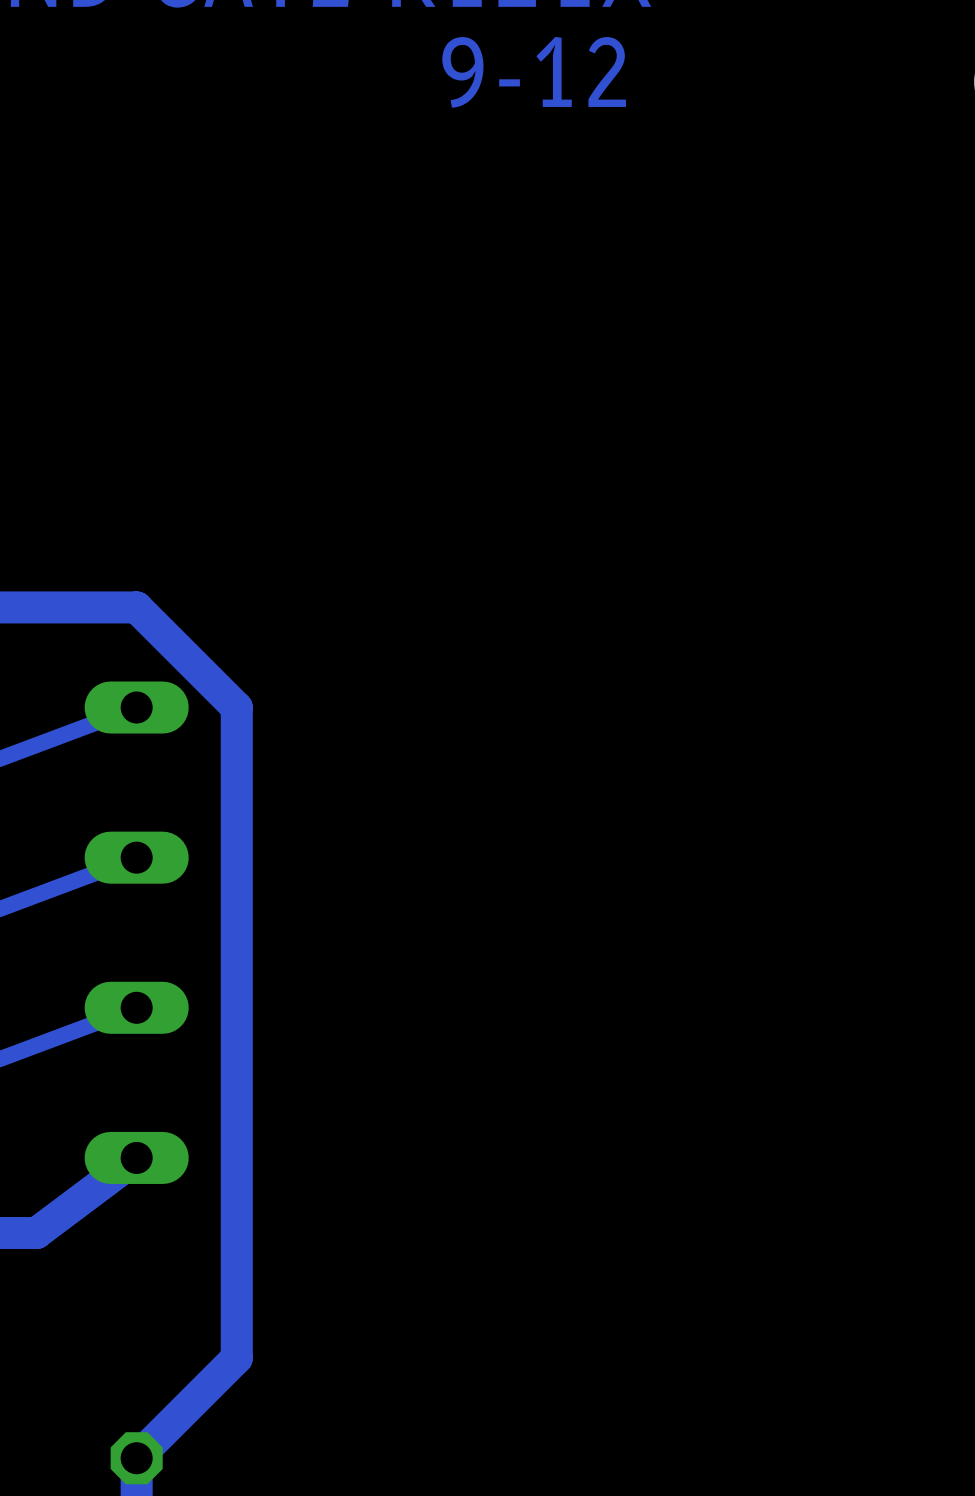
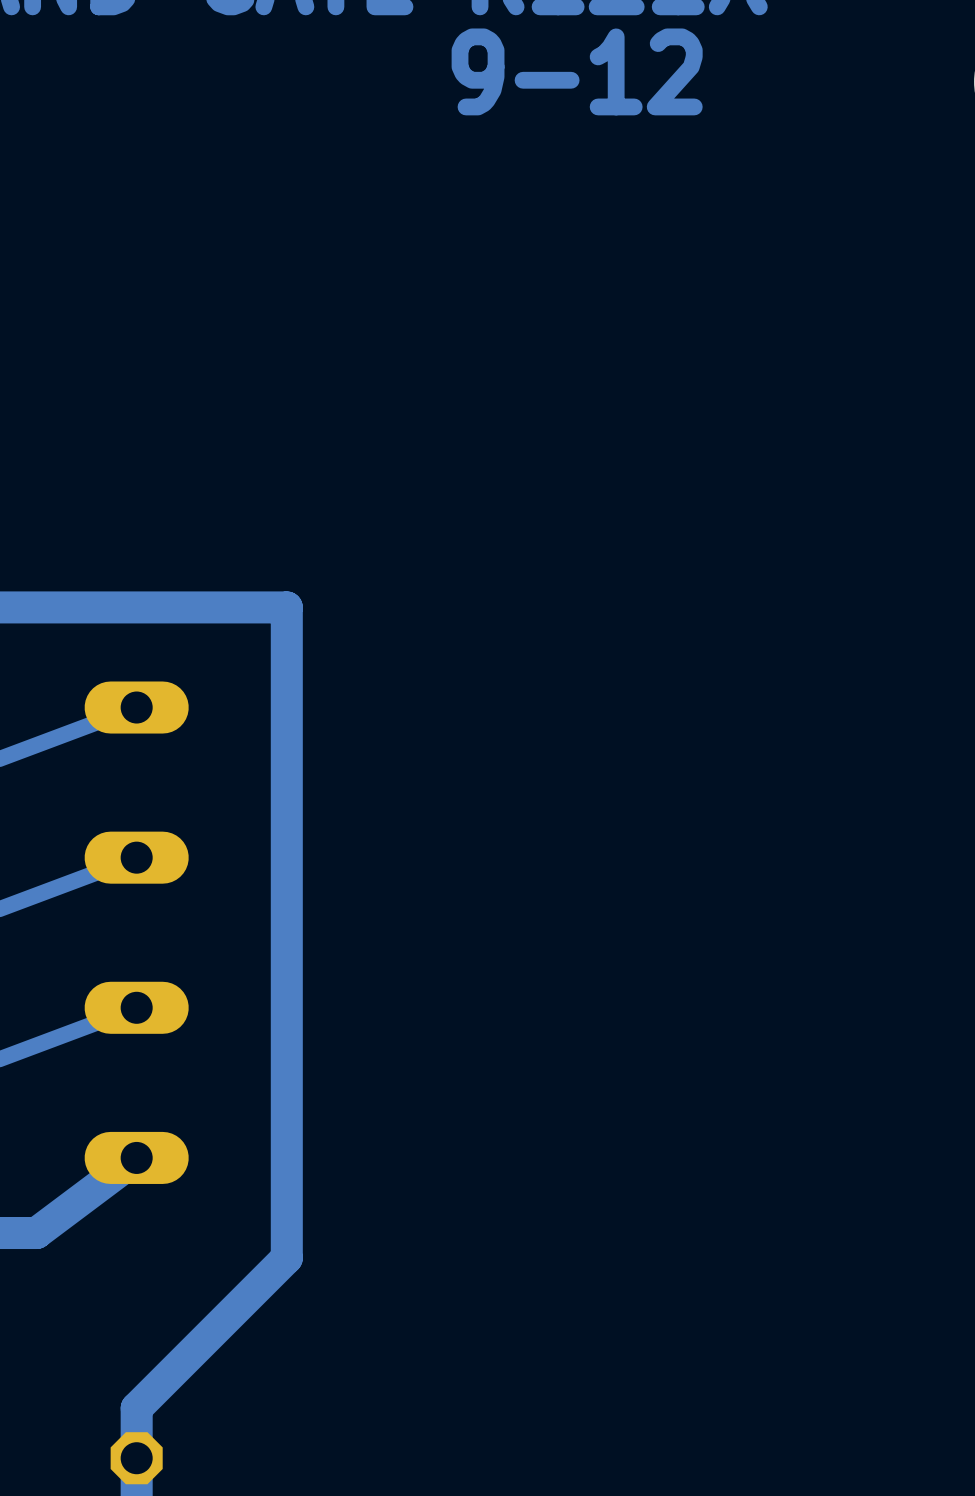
bottom track: (136, 607) (236, 707) (236, 1358) (136, 1458) -> (136, 607) (286, 607) (286, 1258) (136, 1408) (136, 1458)

